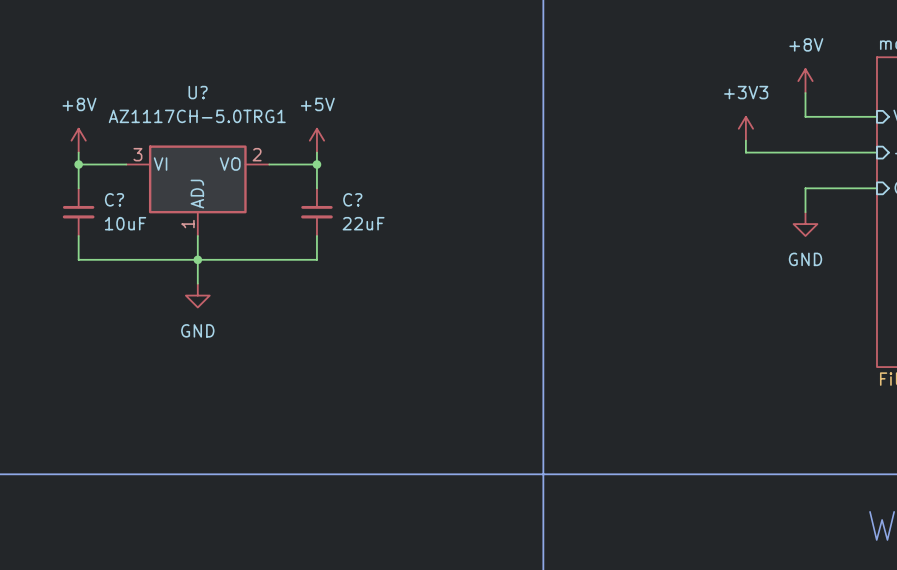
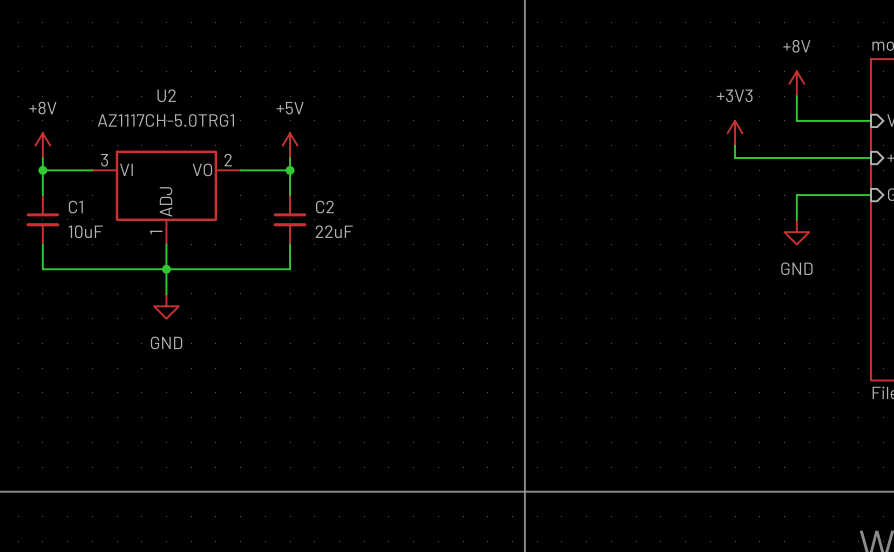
U? name: U? (198, 92) -> U2 (166, 95)
C? name: C? (114, 199) -> C1 (75, 207)
C? name: C? (352, 199) -> C2 (324, 207)

